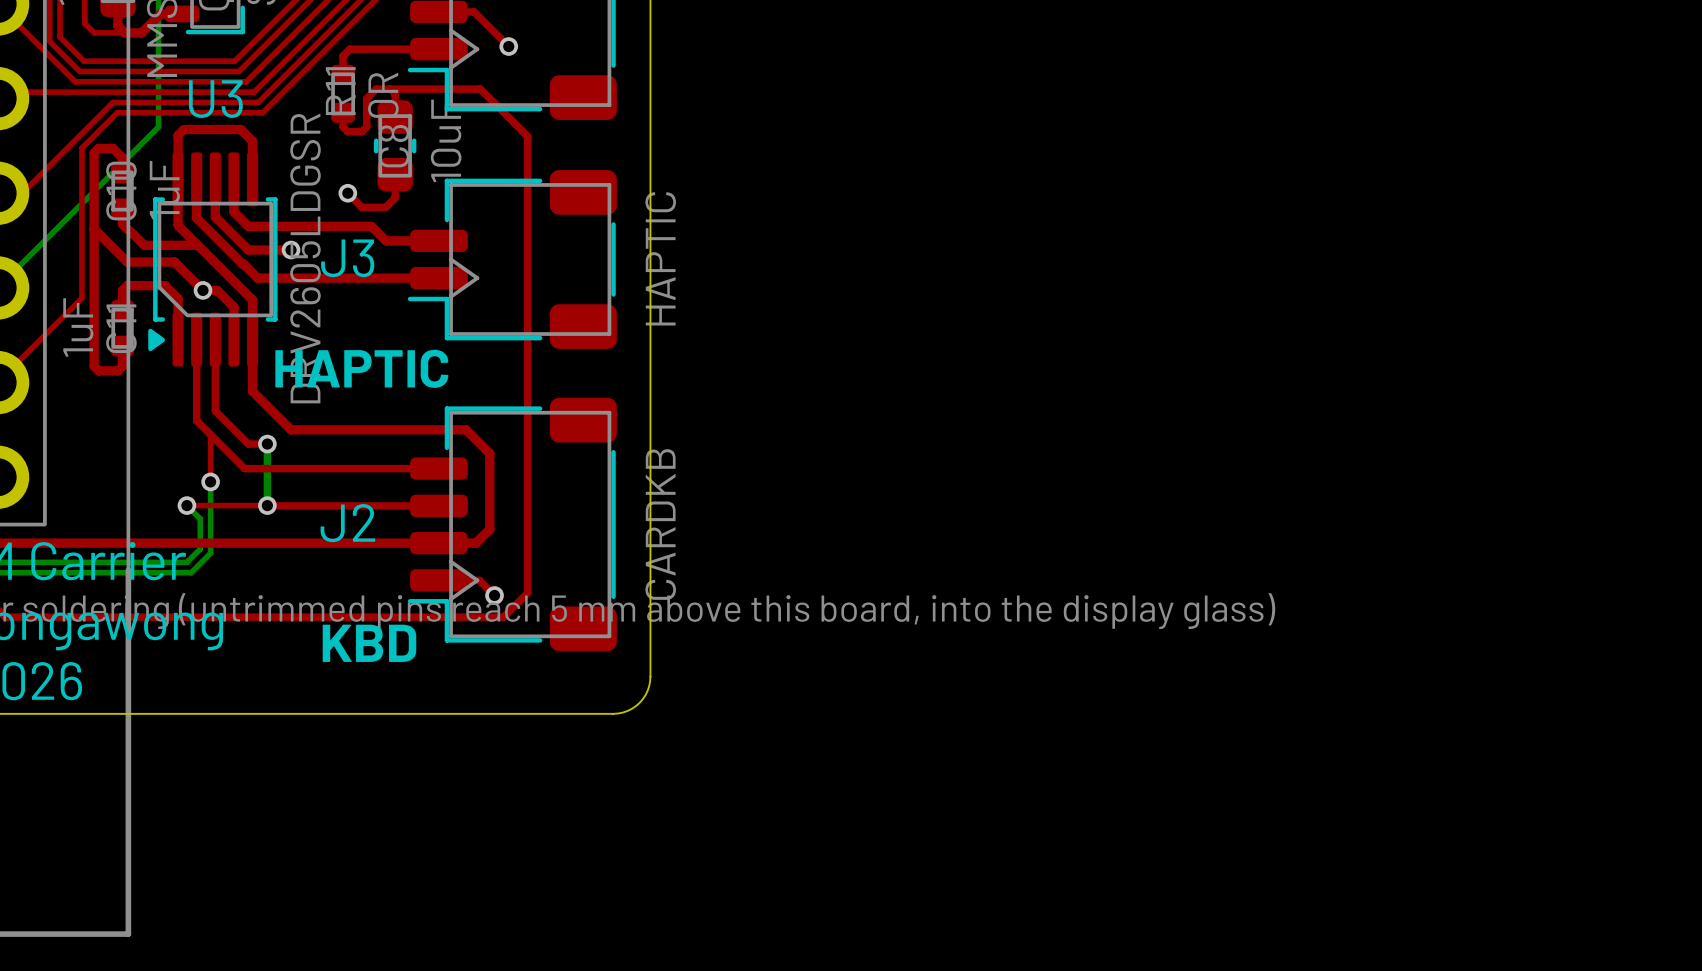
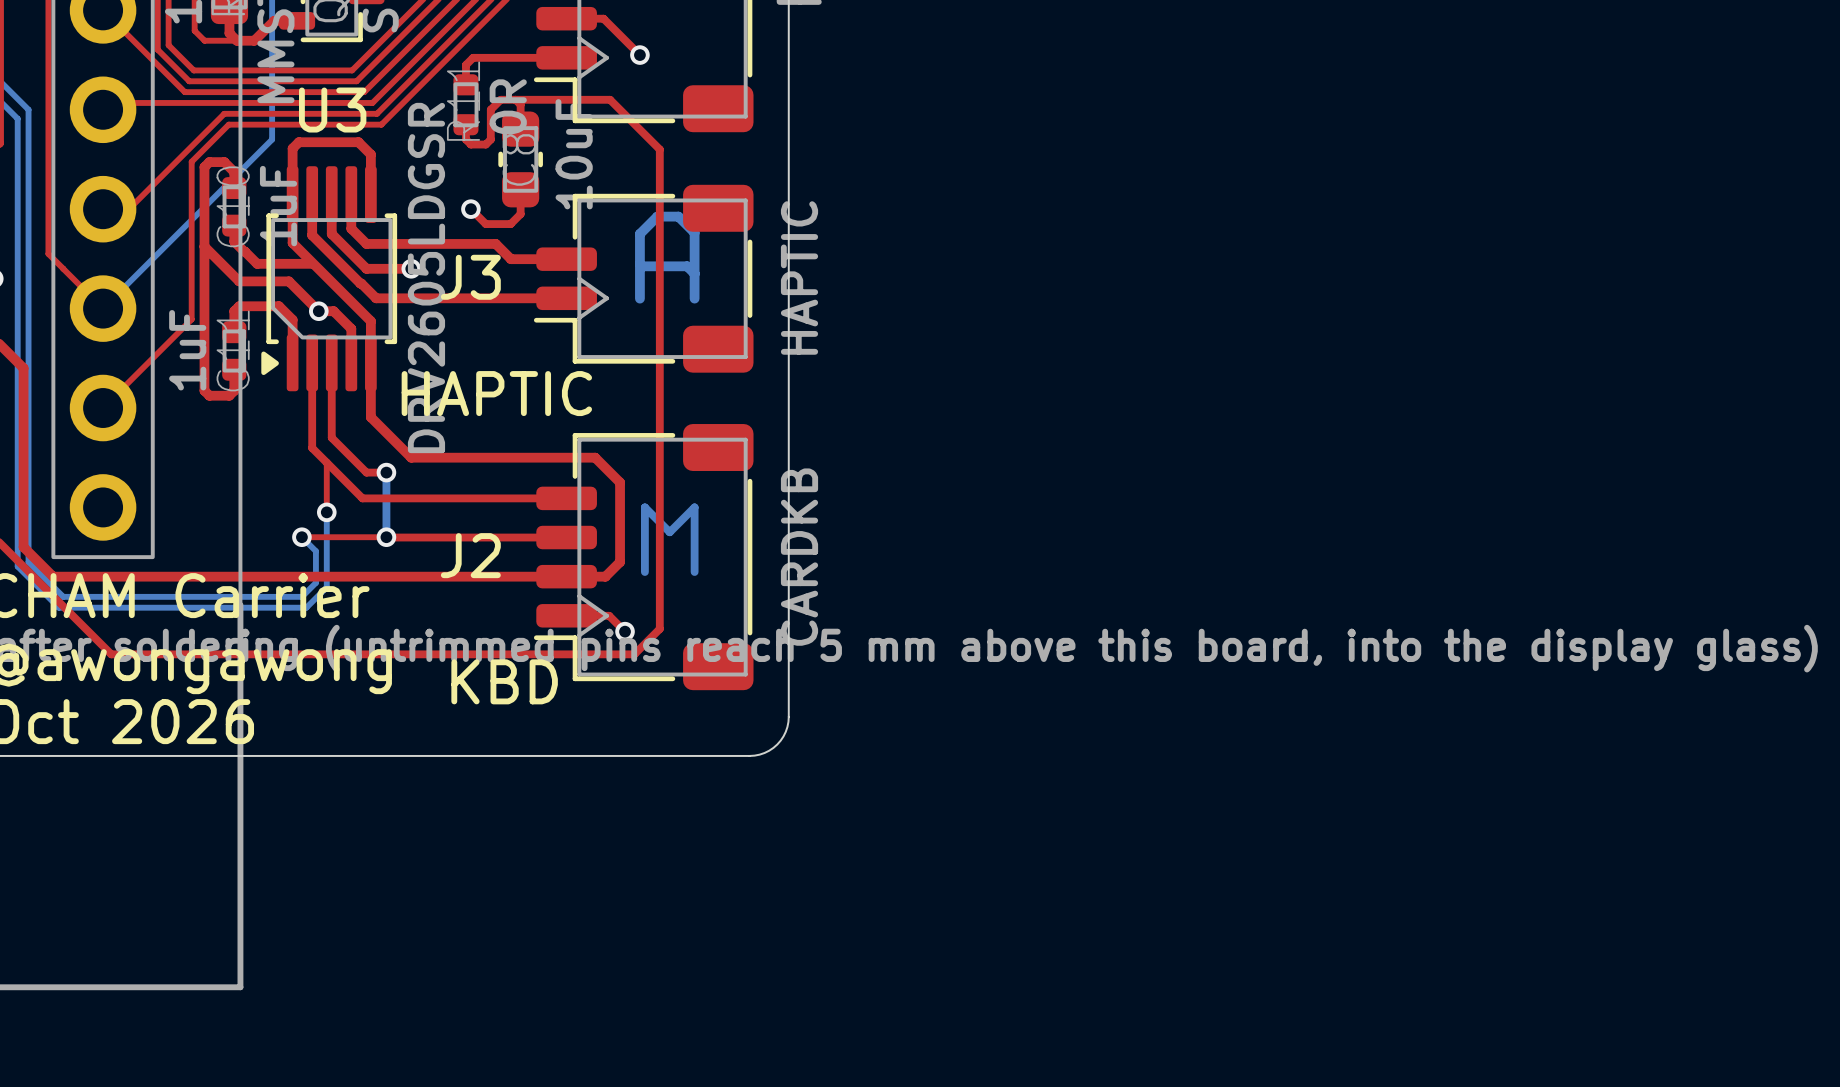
bottom track: none -> (639, 263) (642, 266) (687, 266) (694, 273)
bottom track: none -> (639, 298) (639, 234) (657, 216) (678, 216) (694, 232) (694, 298)
bottom track: none -> (644, 572) (644, 507) (669, 532) (694, 507) (694, 572)

